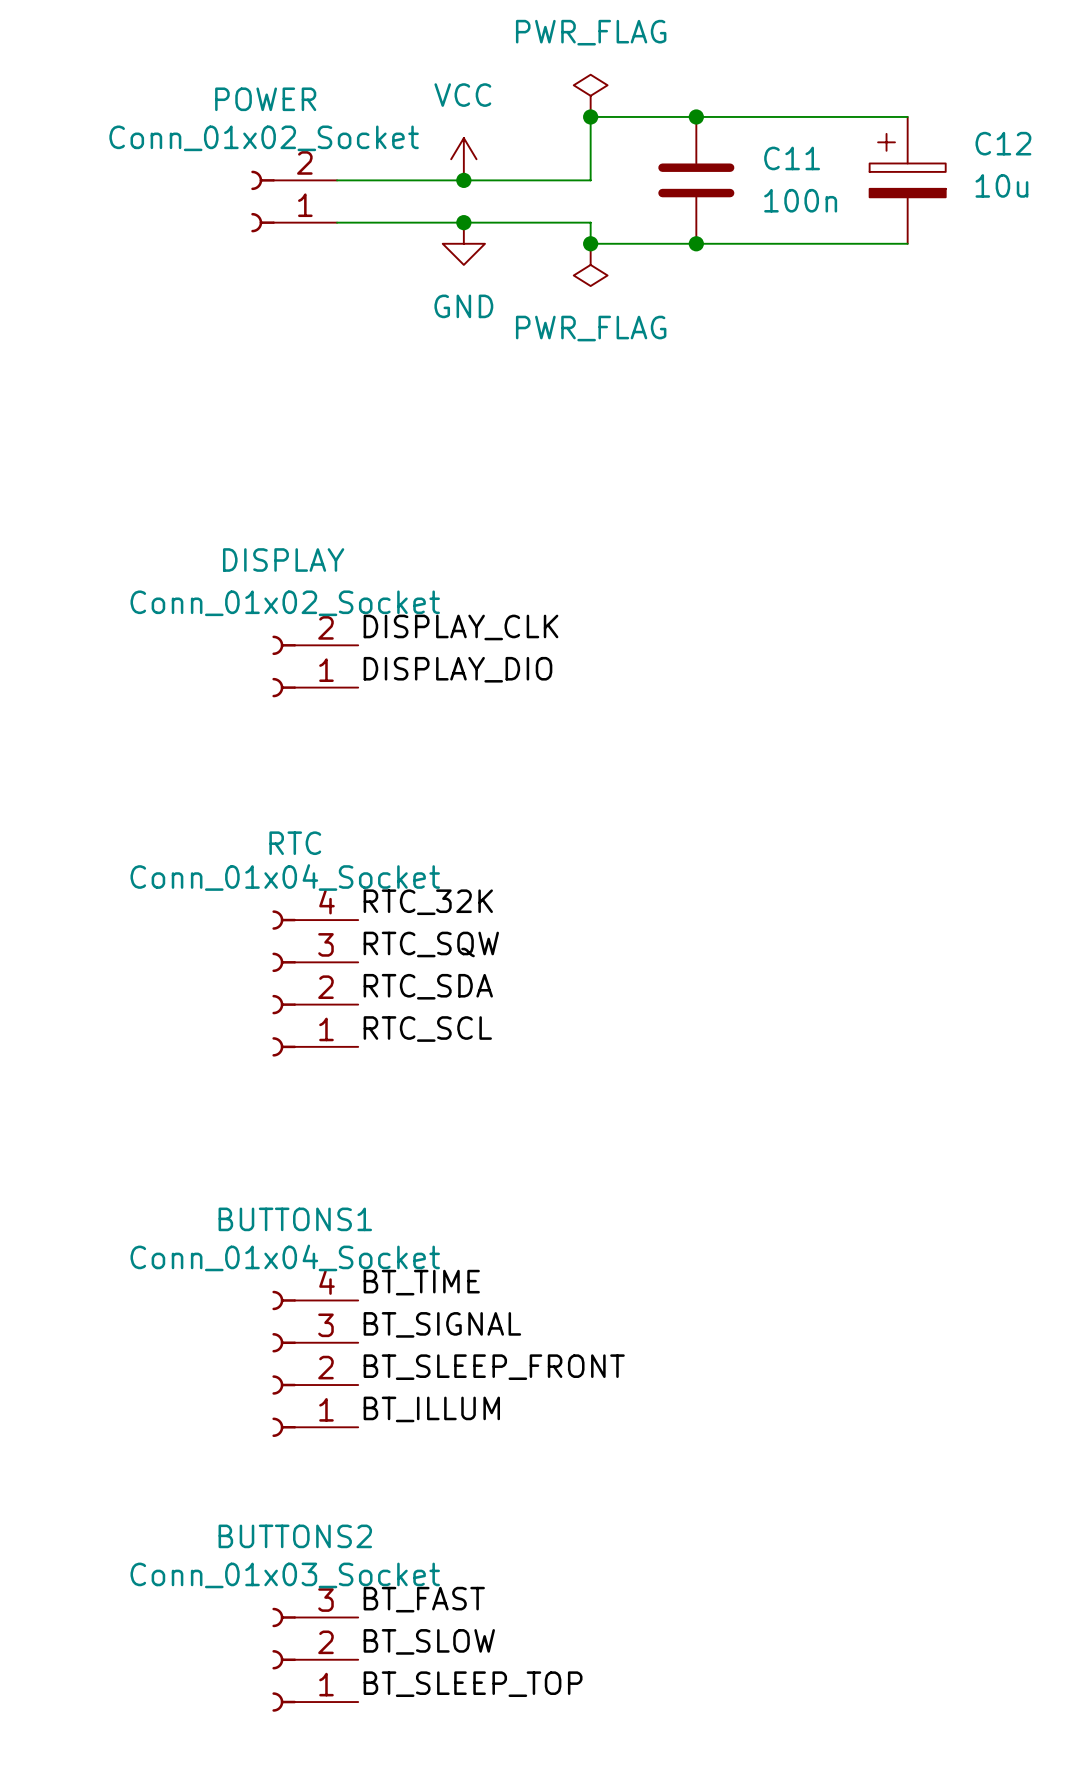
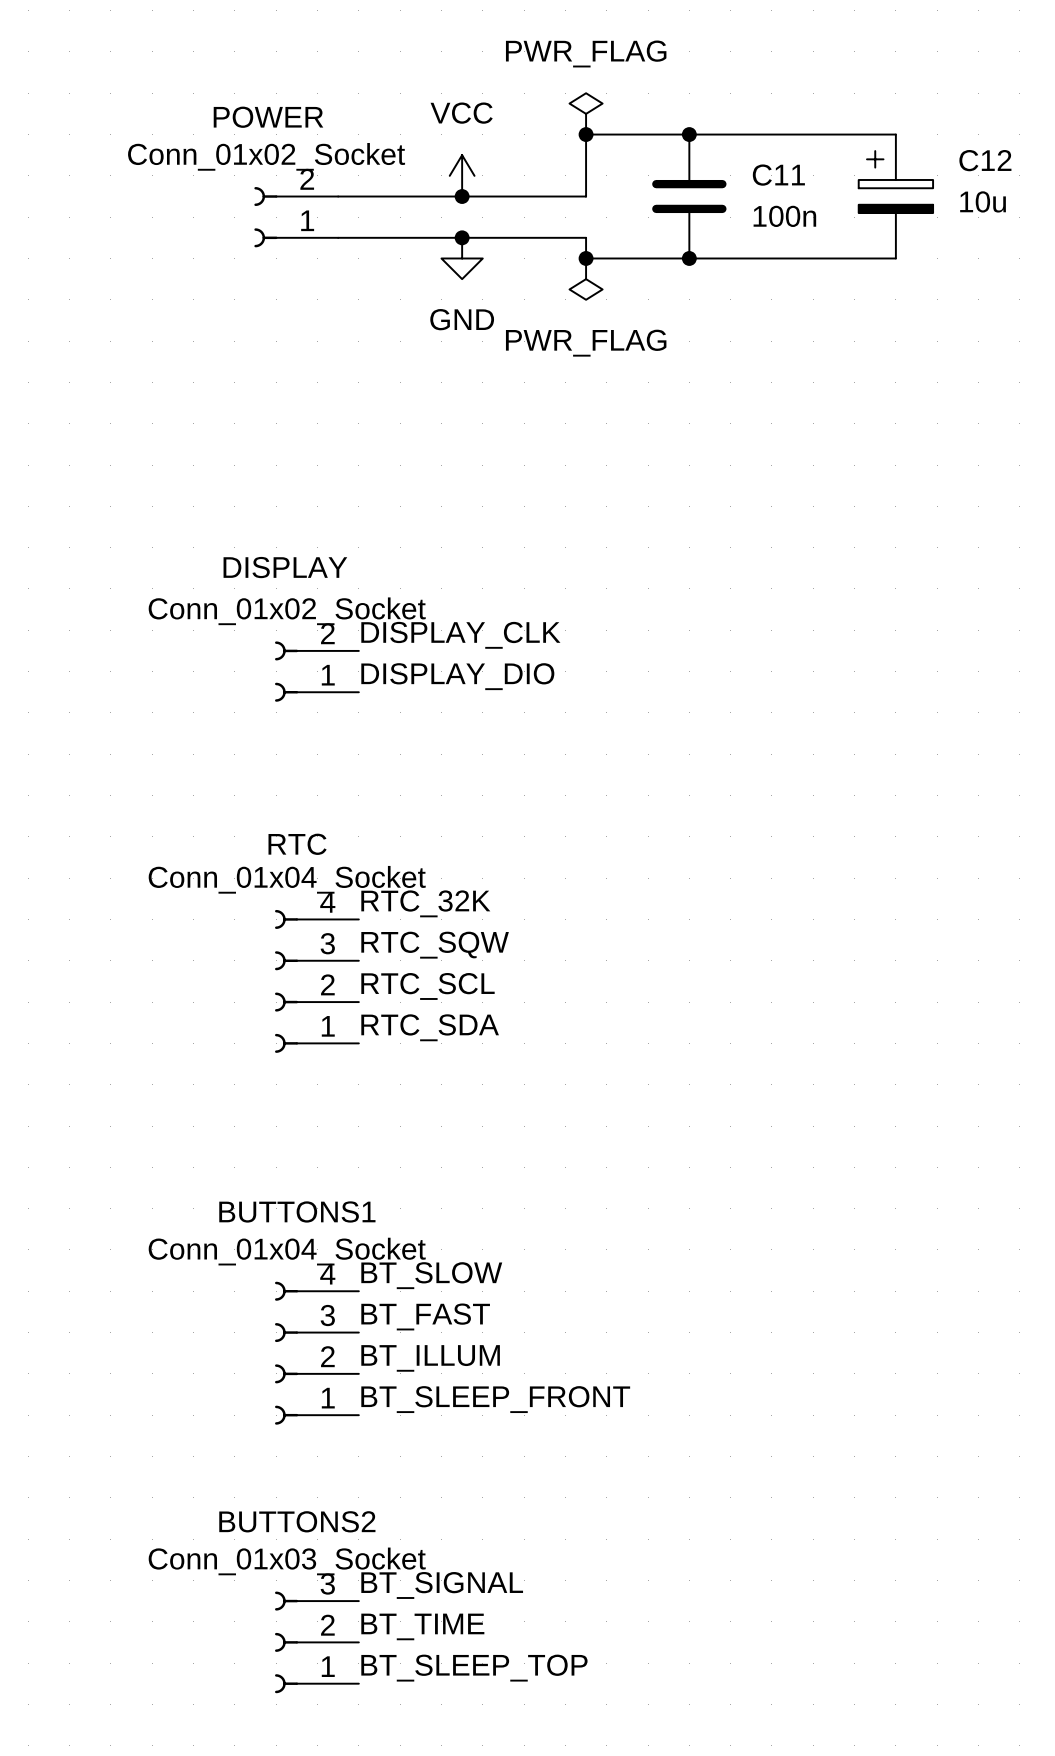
label: RTC_SDA (428, 986) -> RTC_SCL (427, 986)
label: RTC_SCL (427, 1029) -> RTC_SDA (430, 1027)
label: BT_TIME (421, 1282) -> BT_SLOW (431, 1275)
label: BT_SIGNAL (442, 1324) -> BT_FAST (425, 1316)
label: BT_SLEEP_FRONT (494, 1367) -> BT_ILLUM (430, 1358)
label: BT_ILLUM (431, 1409) -> BT_SLEEP_FRONT (495, 1399)
label: BT_FAST (424, 1599) -> BT_SIGNAL (442, 1585)
label: BT_SLOW (429, 1641) -> BT_TIME (422, 1626)

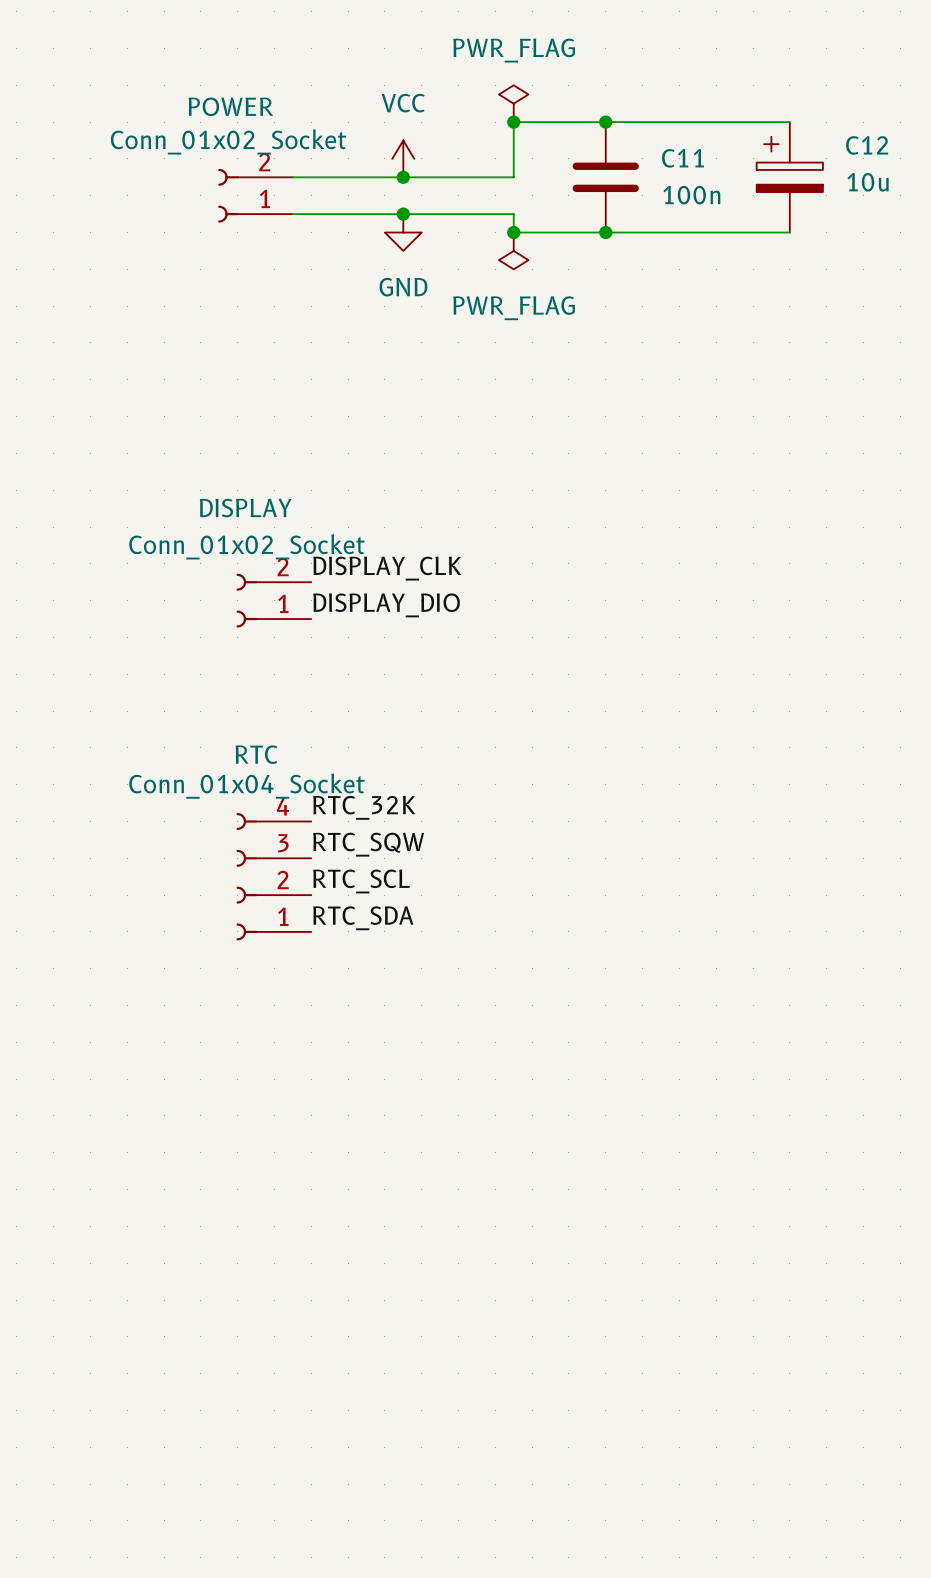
label: BT_SLOW (431, 1275) -> none
label: BT_FAST (425, 1316) -> none
part: Conn_01x04_Socket (316, 1353) -> none
label: BT_ILLUM (430, 1358) -> none
label: BT_SLEEP_FRONT (495, 1399) -> none
label: BT_SIGNAL (442, 1585) -> none
label: BT_TIME (422, 1626) -> none
part: Conn_01x03_Socket (316, 1642) -> none
label: BT_SLEEP_TOP (474, 1668) -> none

